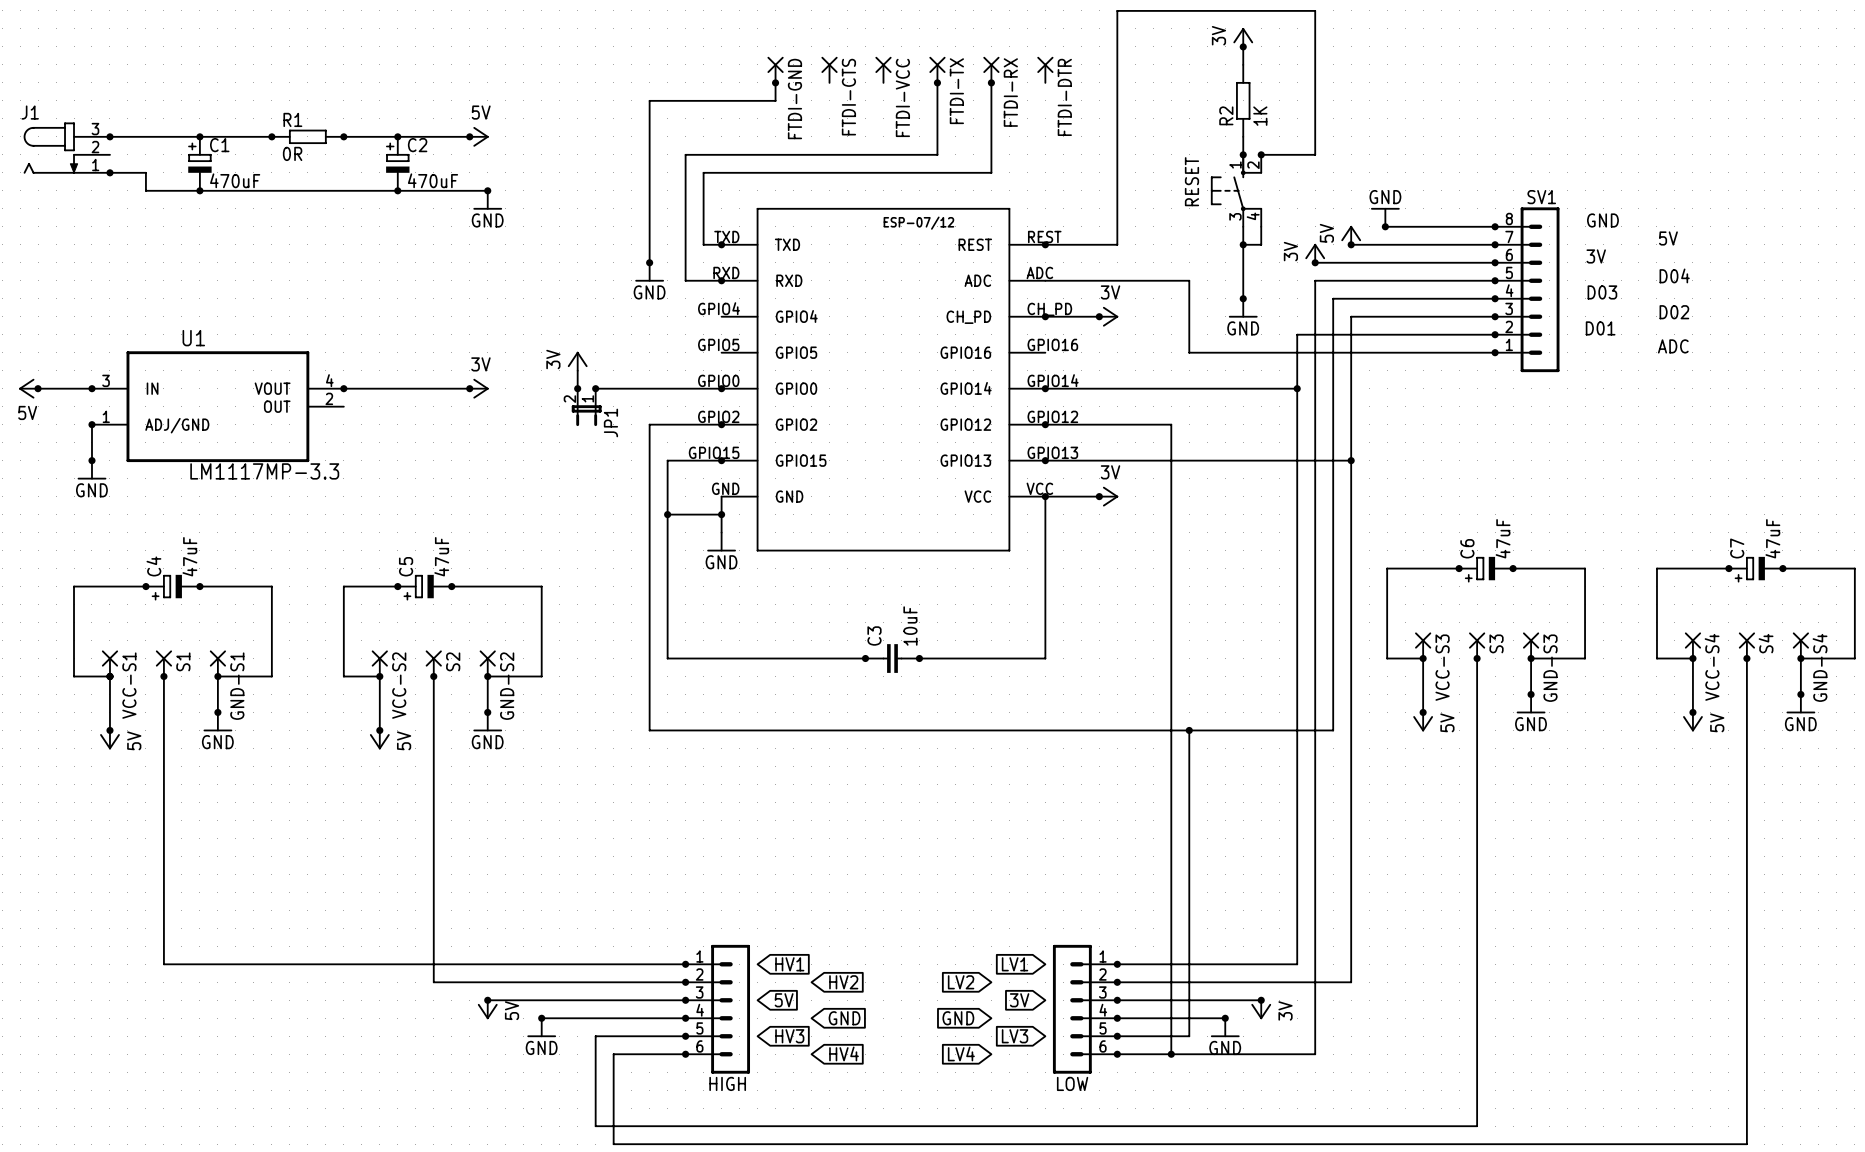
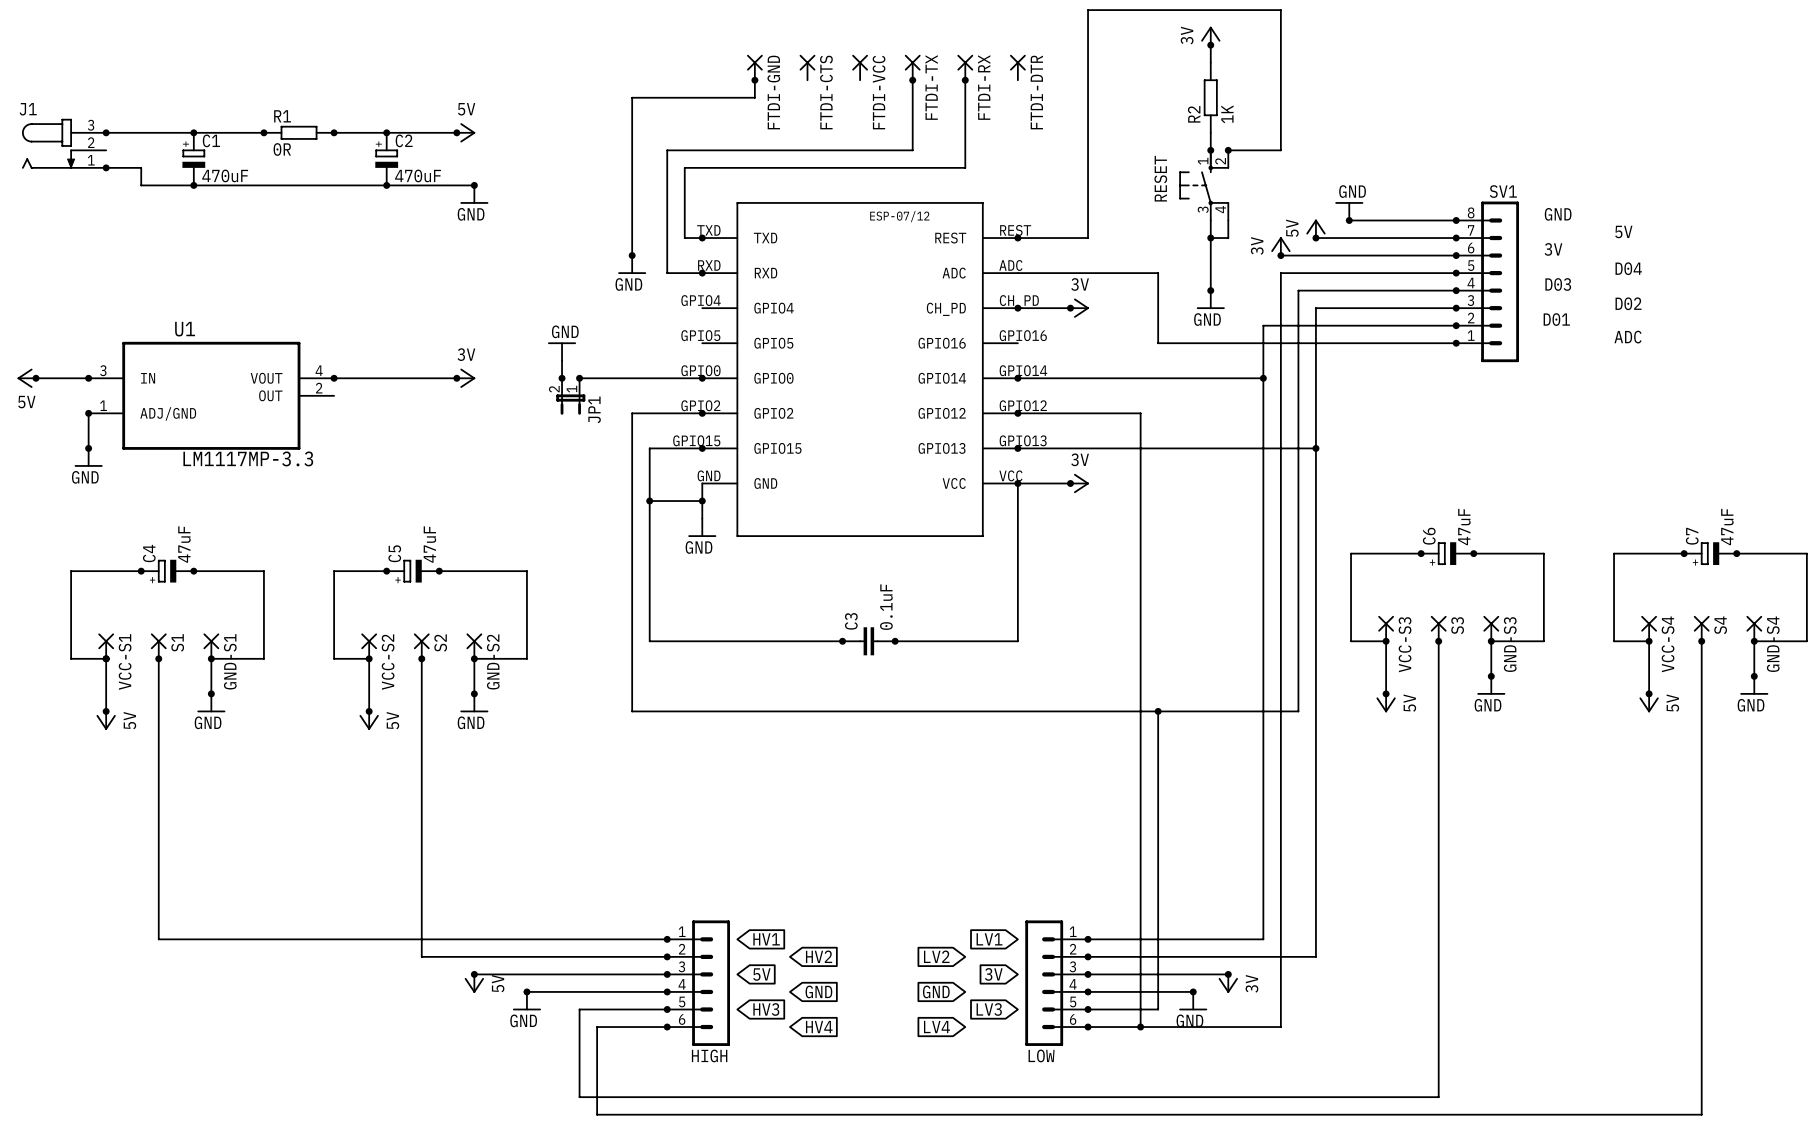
power symbol: 3V (577, 361) -> GND (562, 351)
C3 value: 10uF (910, 626) -> 0.1uF (886, 607)

